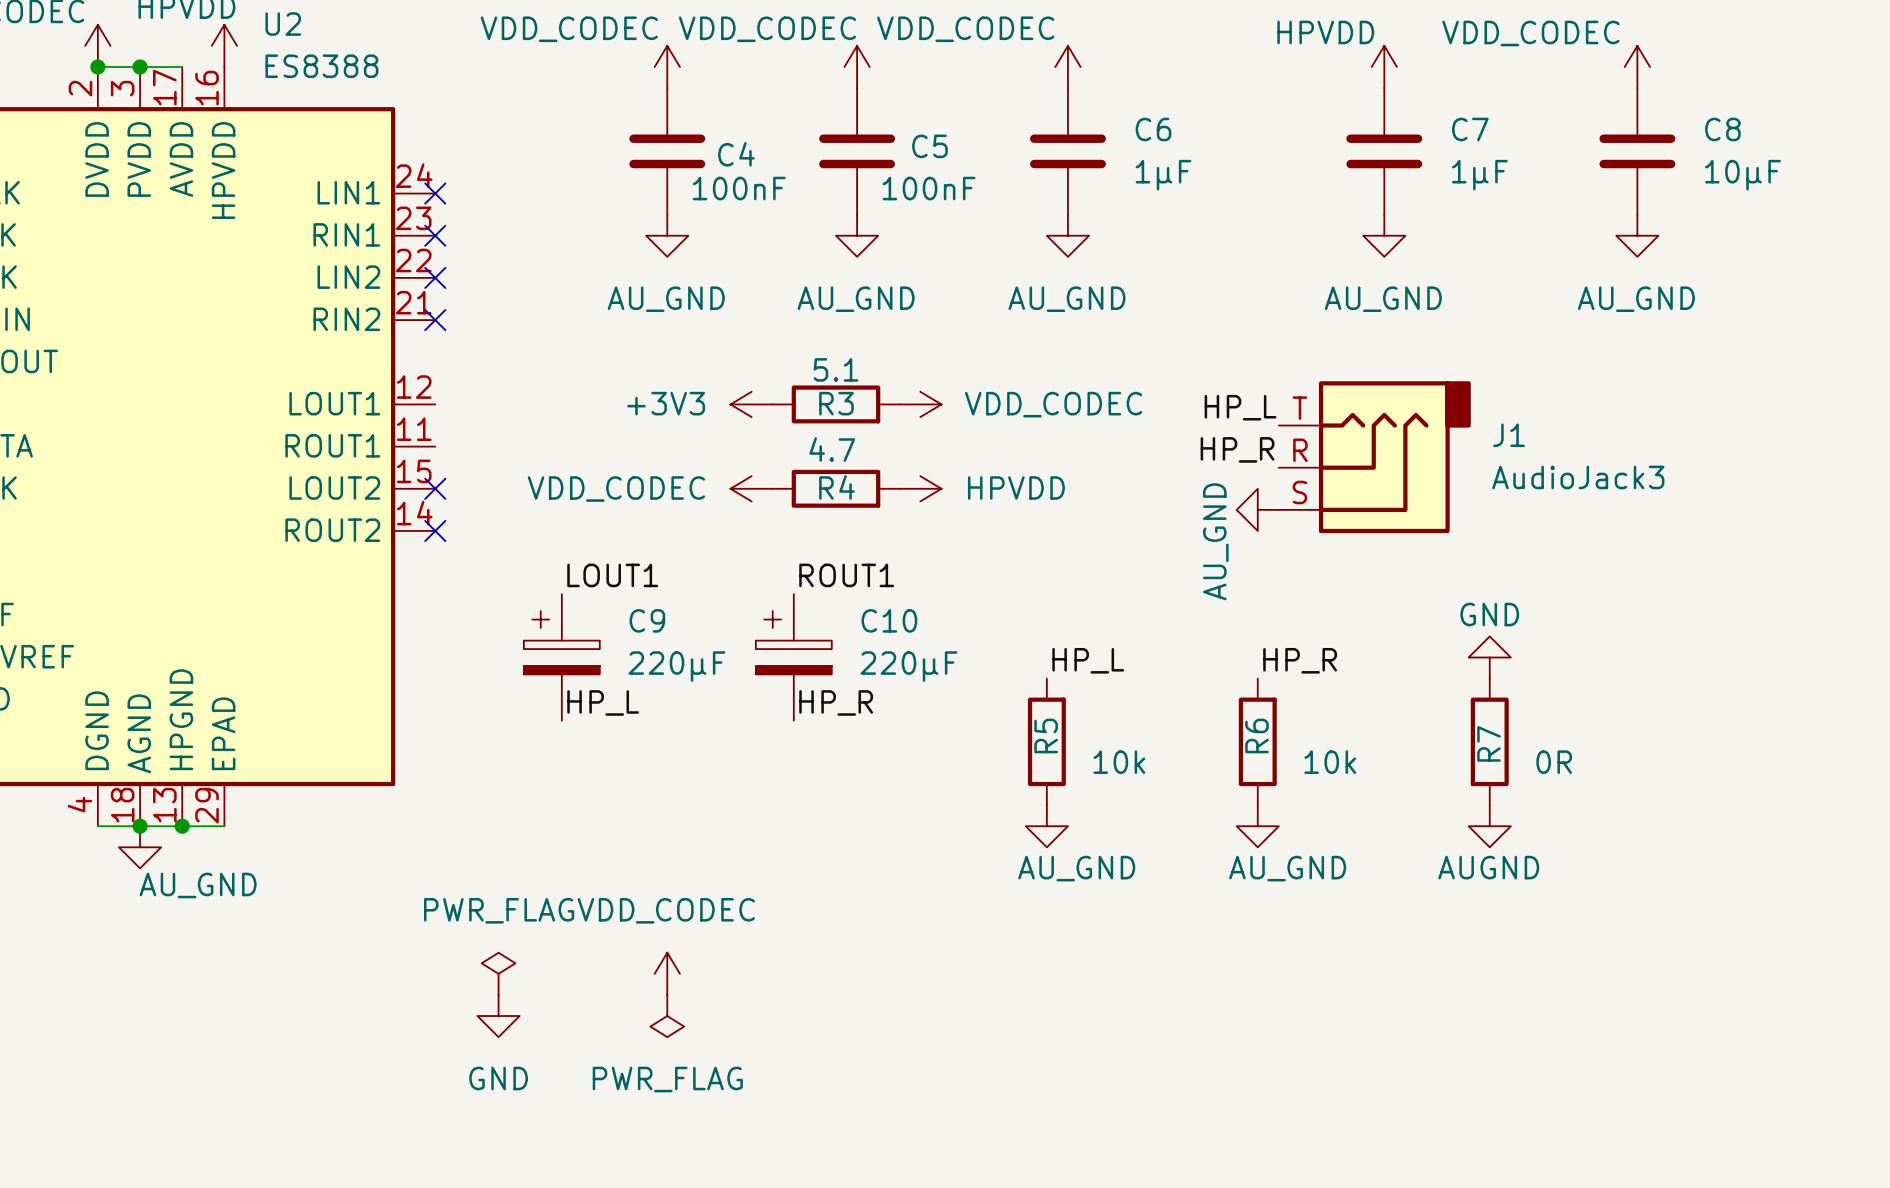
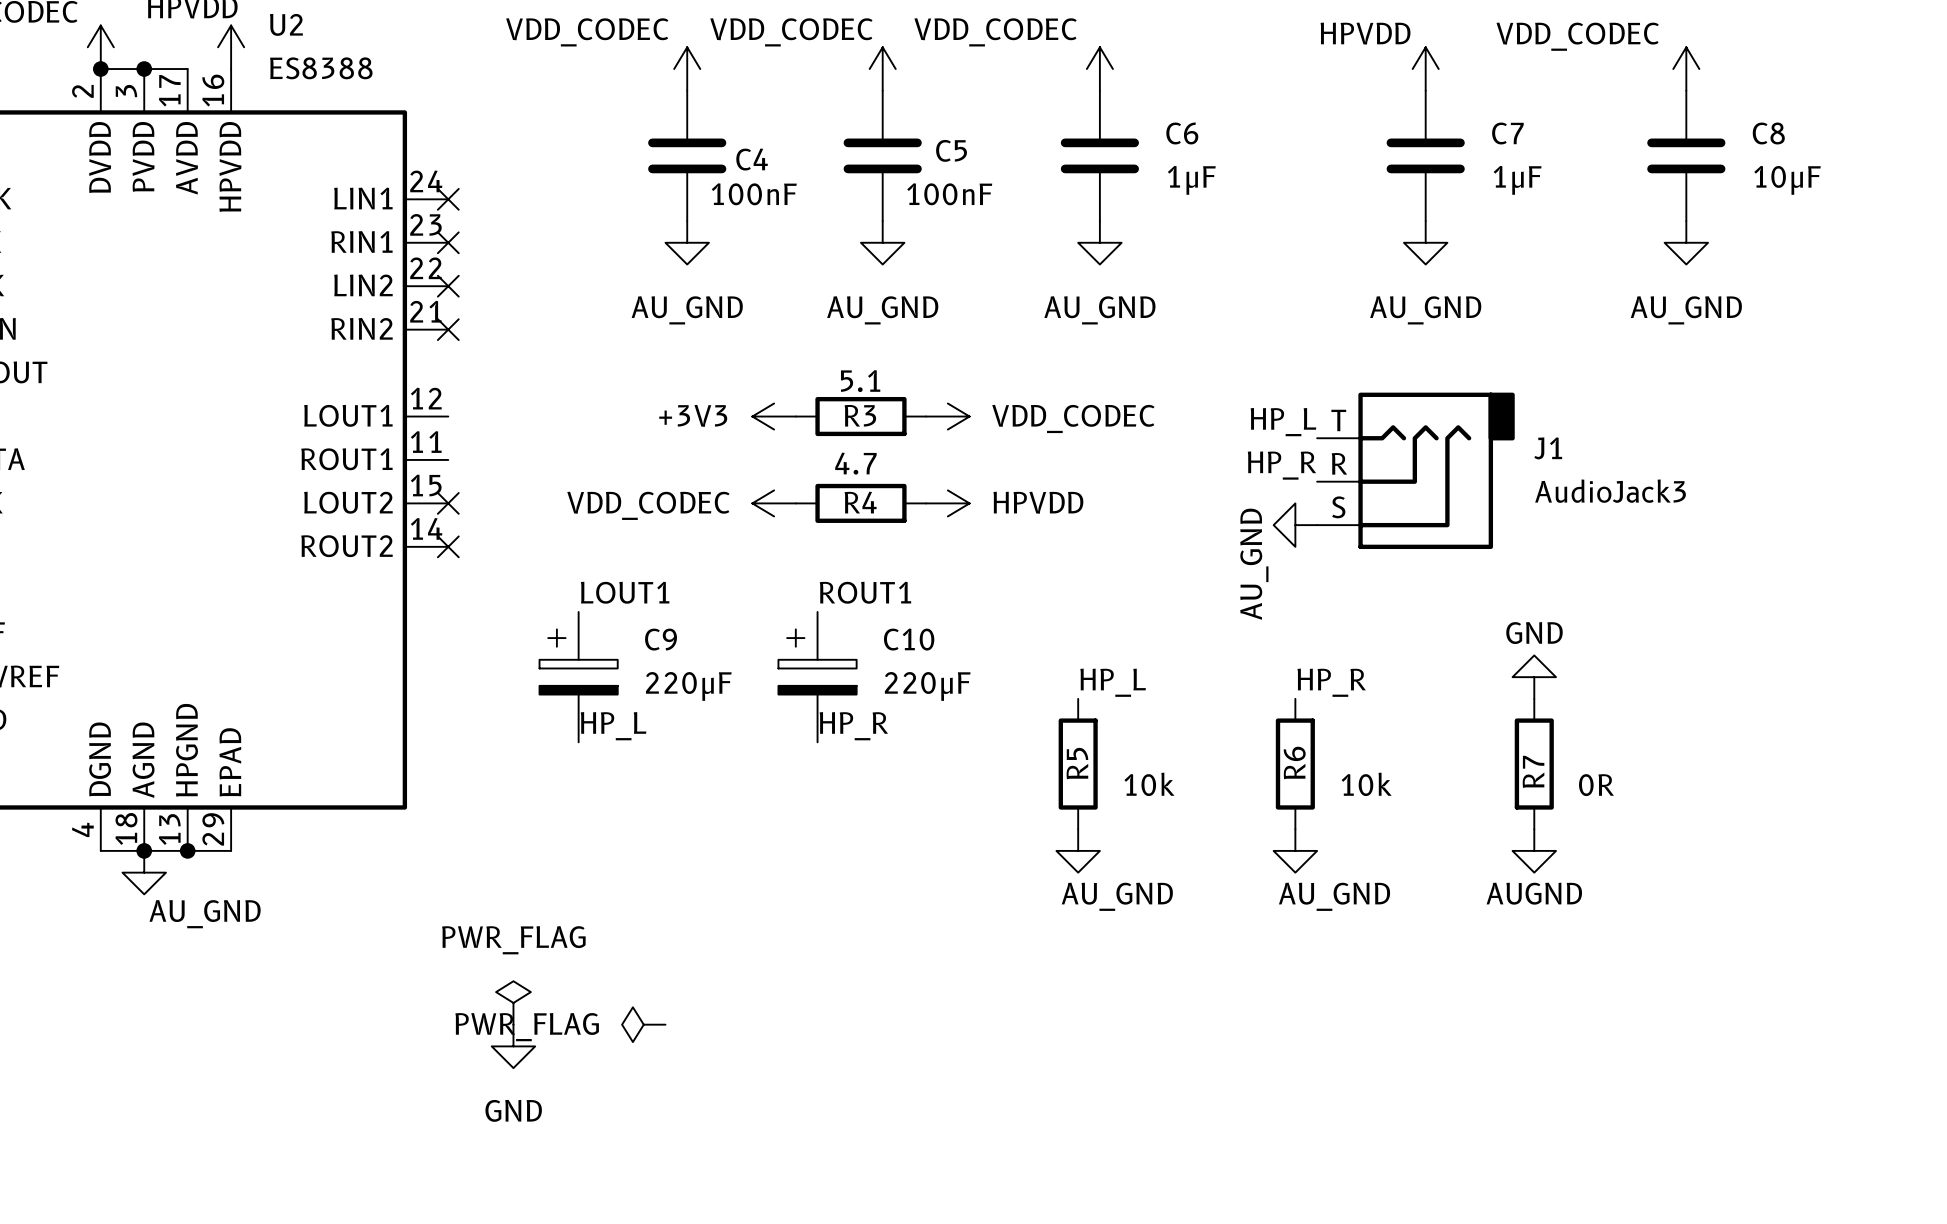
power symbol: VDD_CODEC (667, 973) -> none
power symbol rotation: 0° (667, 1016) -> 90° clockwise (643, 1024)
power symbol position: PWR_FLAG (667, 1016) -> PWR_FLAG (643, 1024)
power symbol text position: PWR_FLAG (667, 1079) -> PWR_FLAG (527, 1027)

